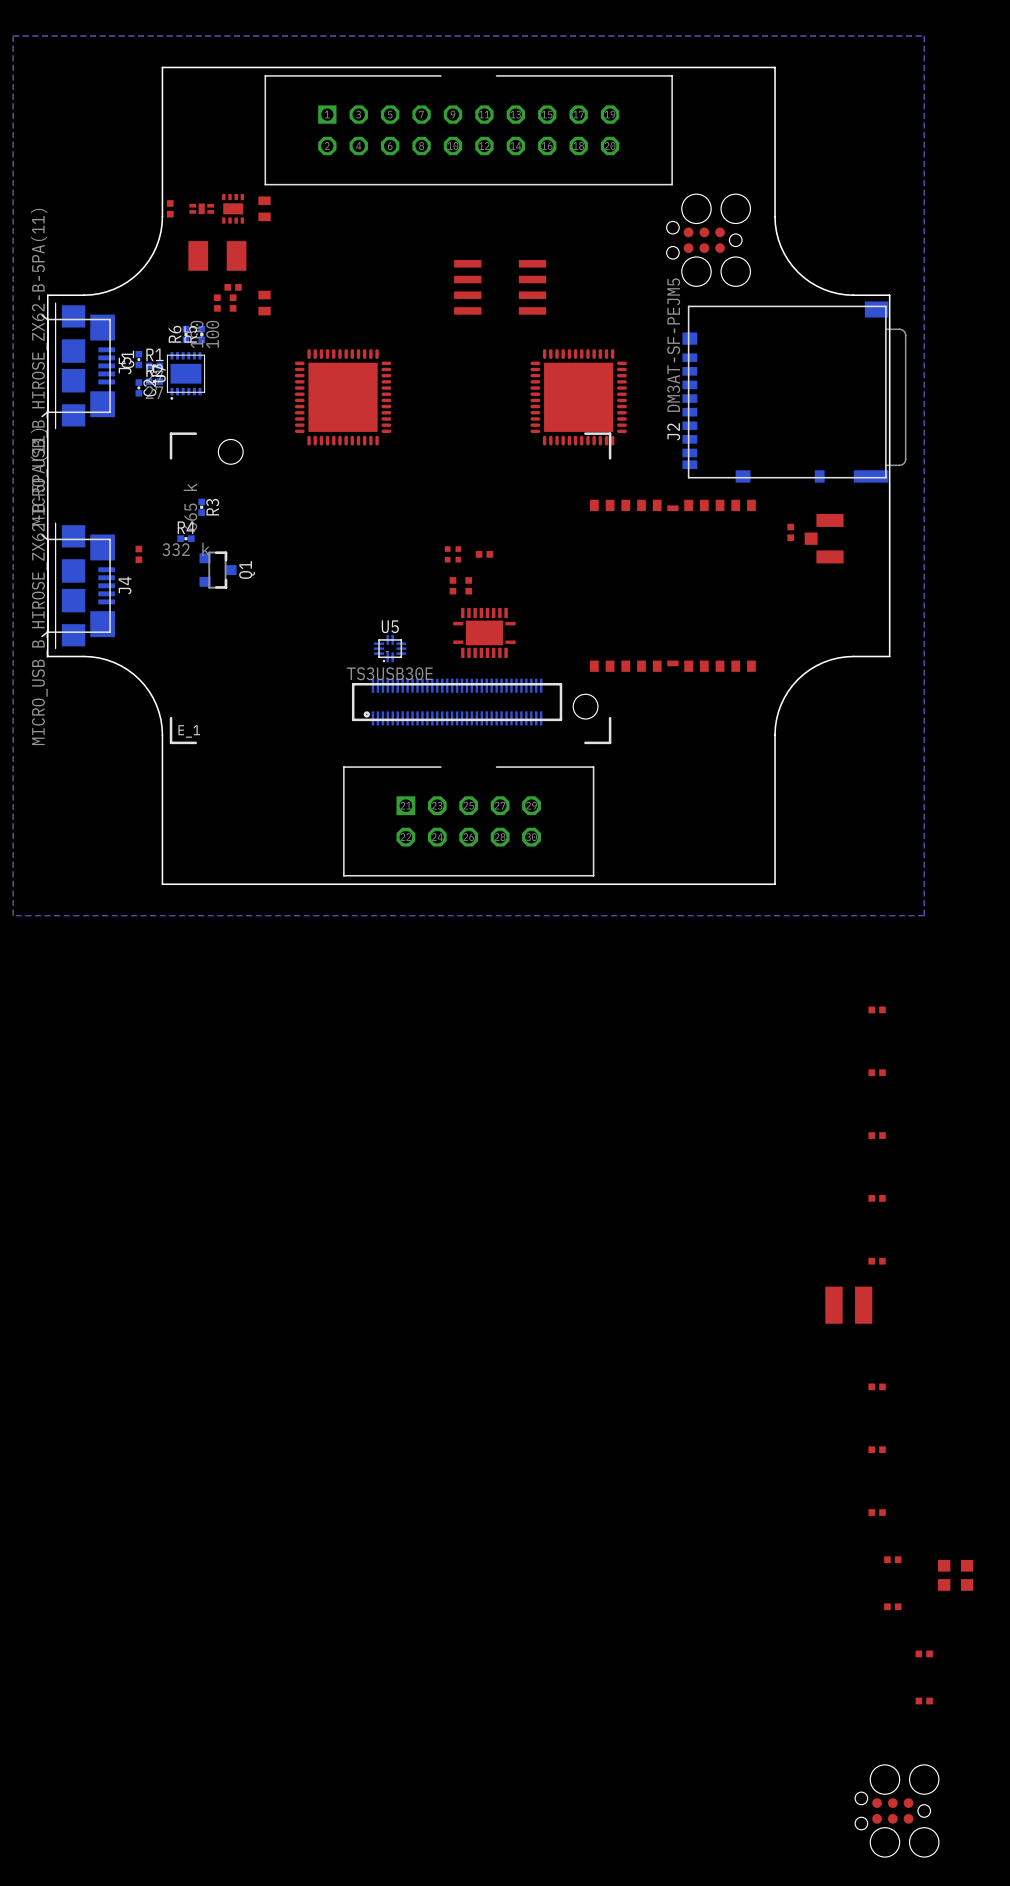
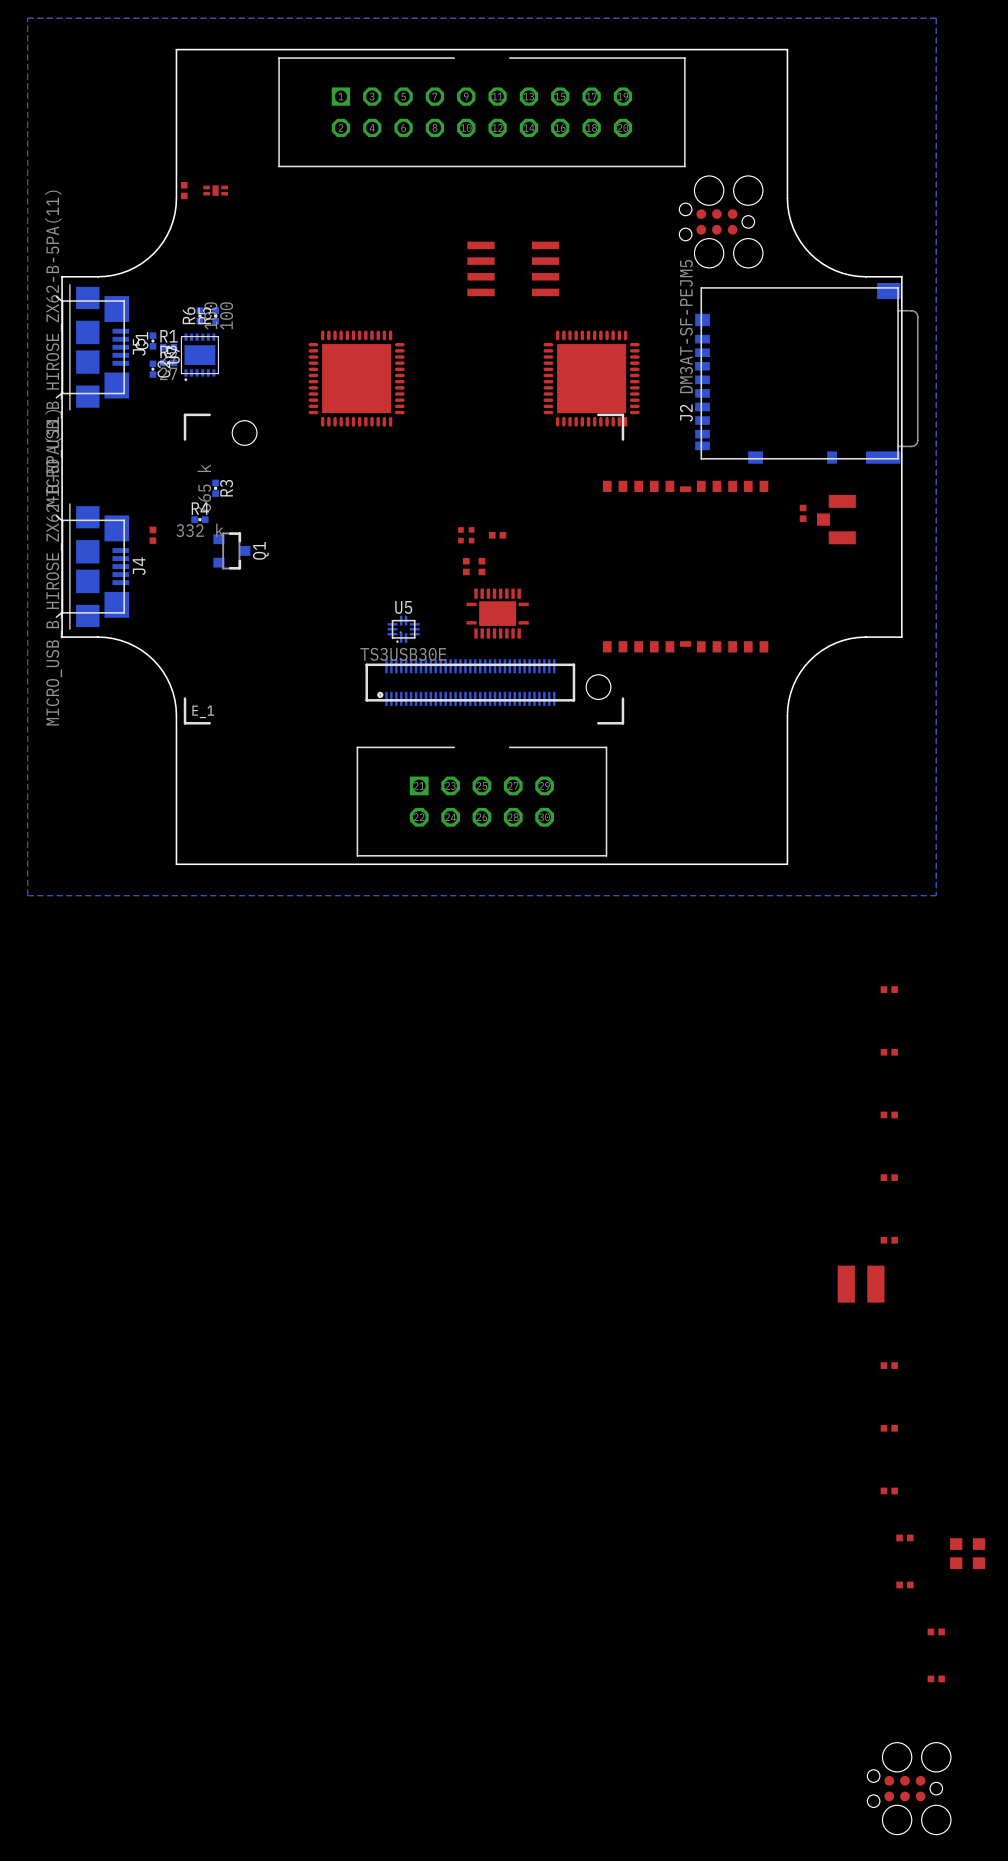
part: (233, 208) -> none
part: (264, 208) -> none
part: (217, 255) -> none
part: (233, 287) -> none
part: (217, 303) -> none
part: (233, 303) -> none
part: (264, 303) -> none

